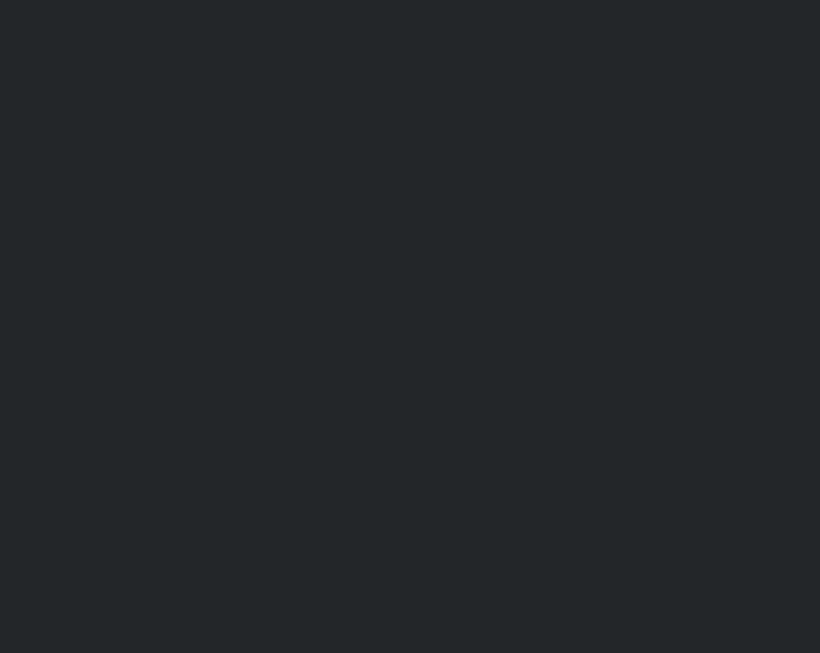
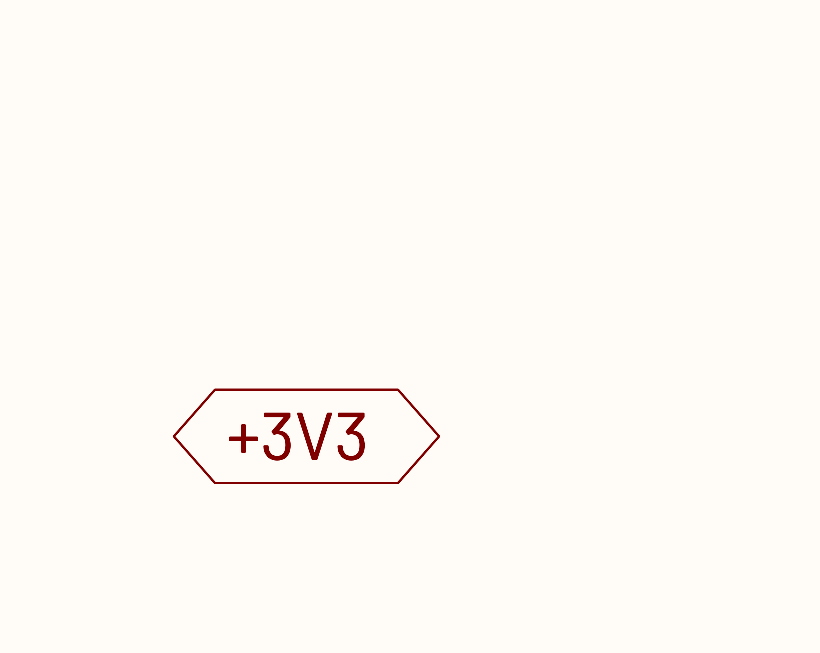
global label: none -> +3V3 (296, 436)

